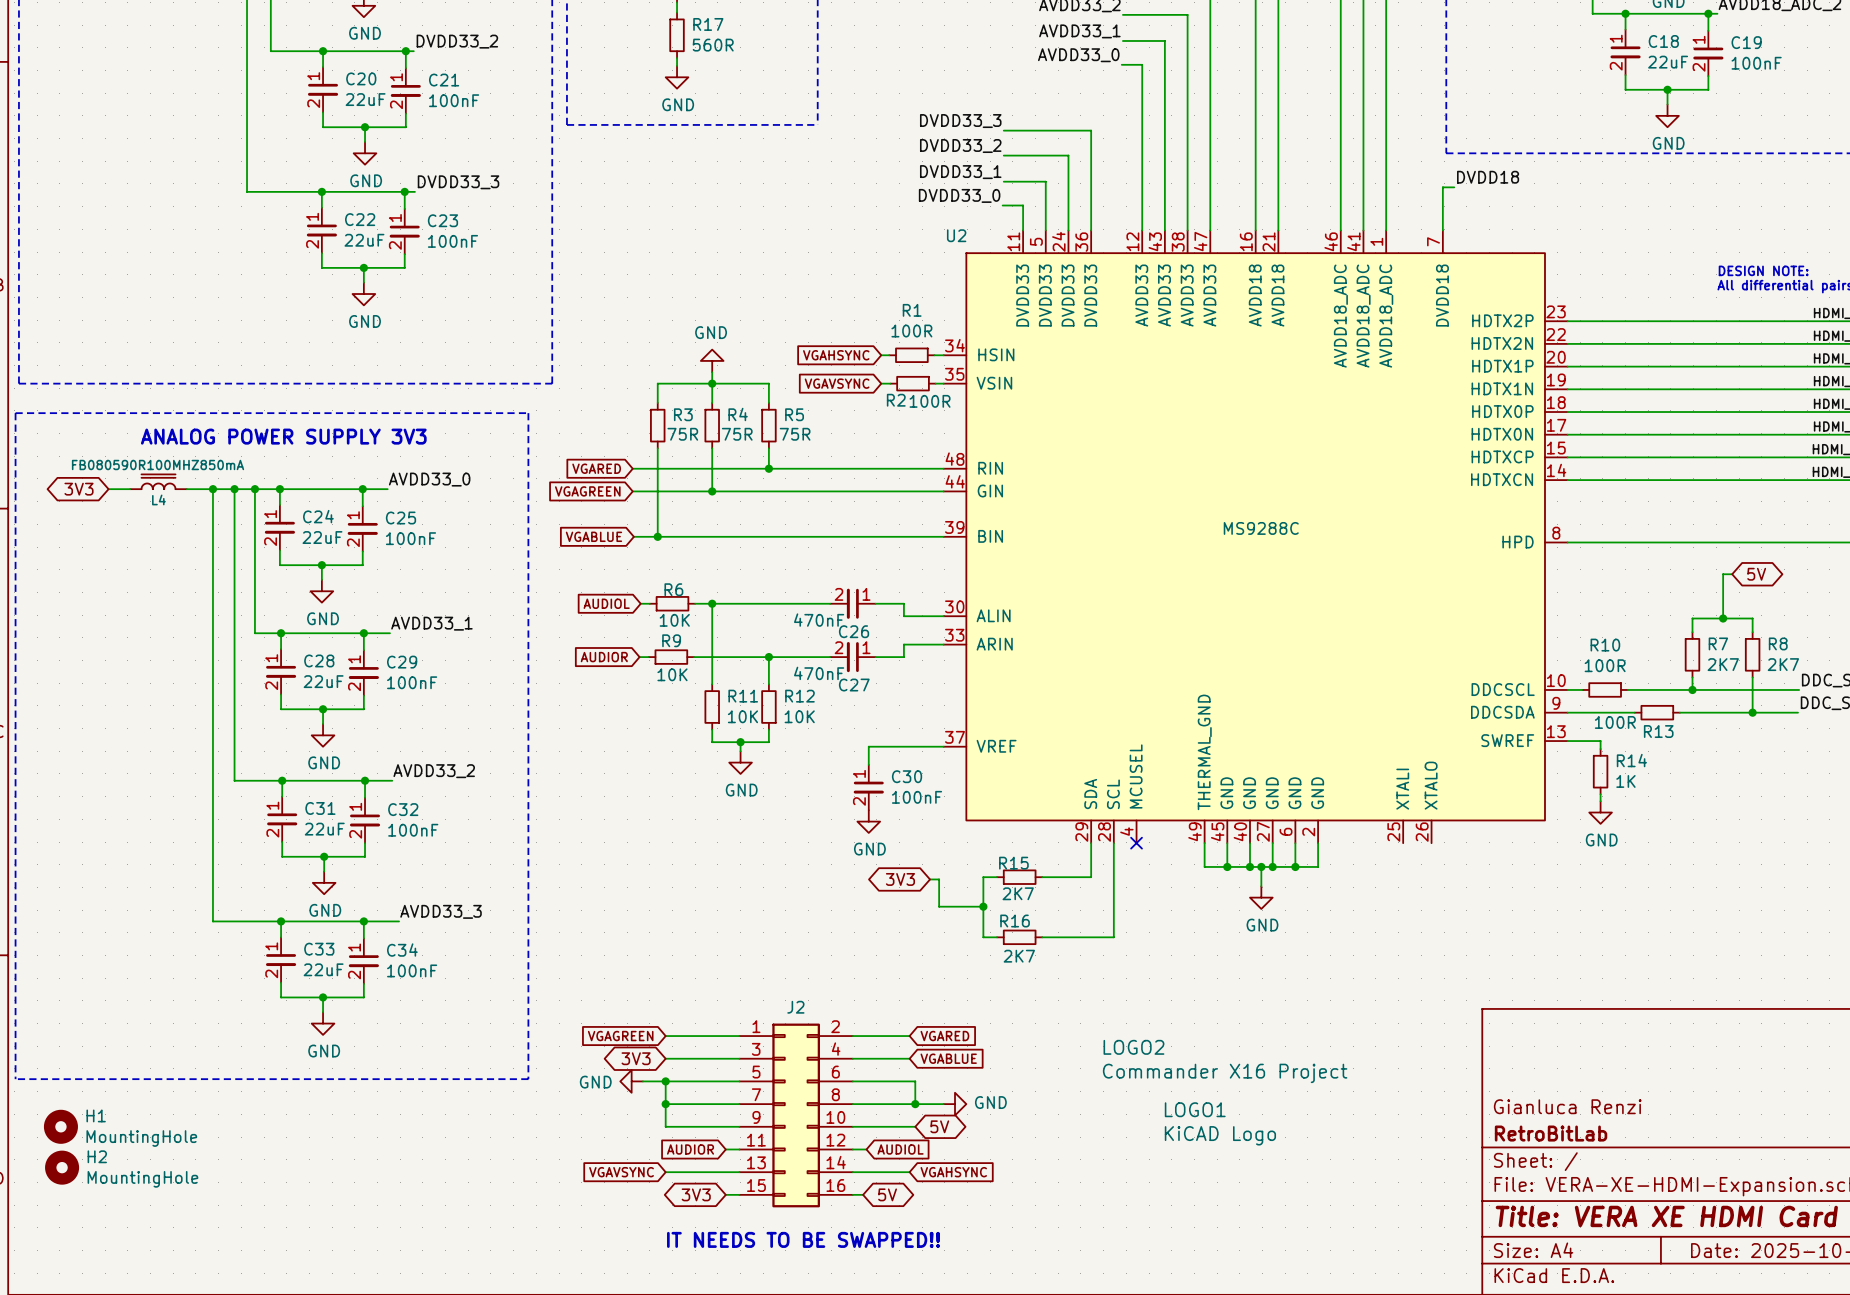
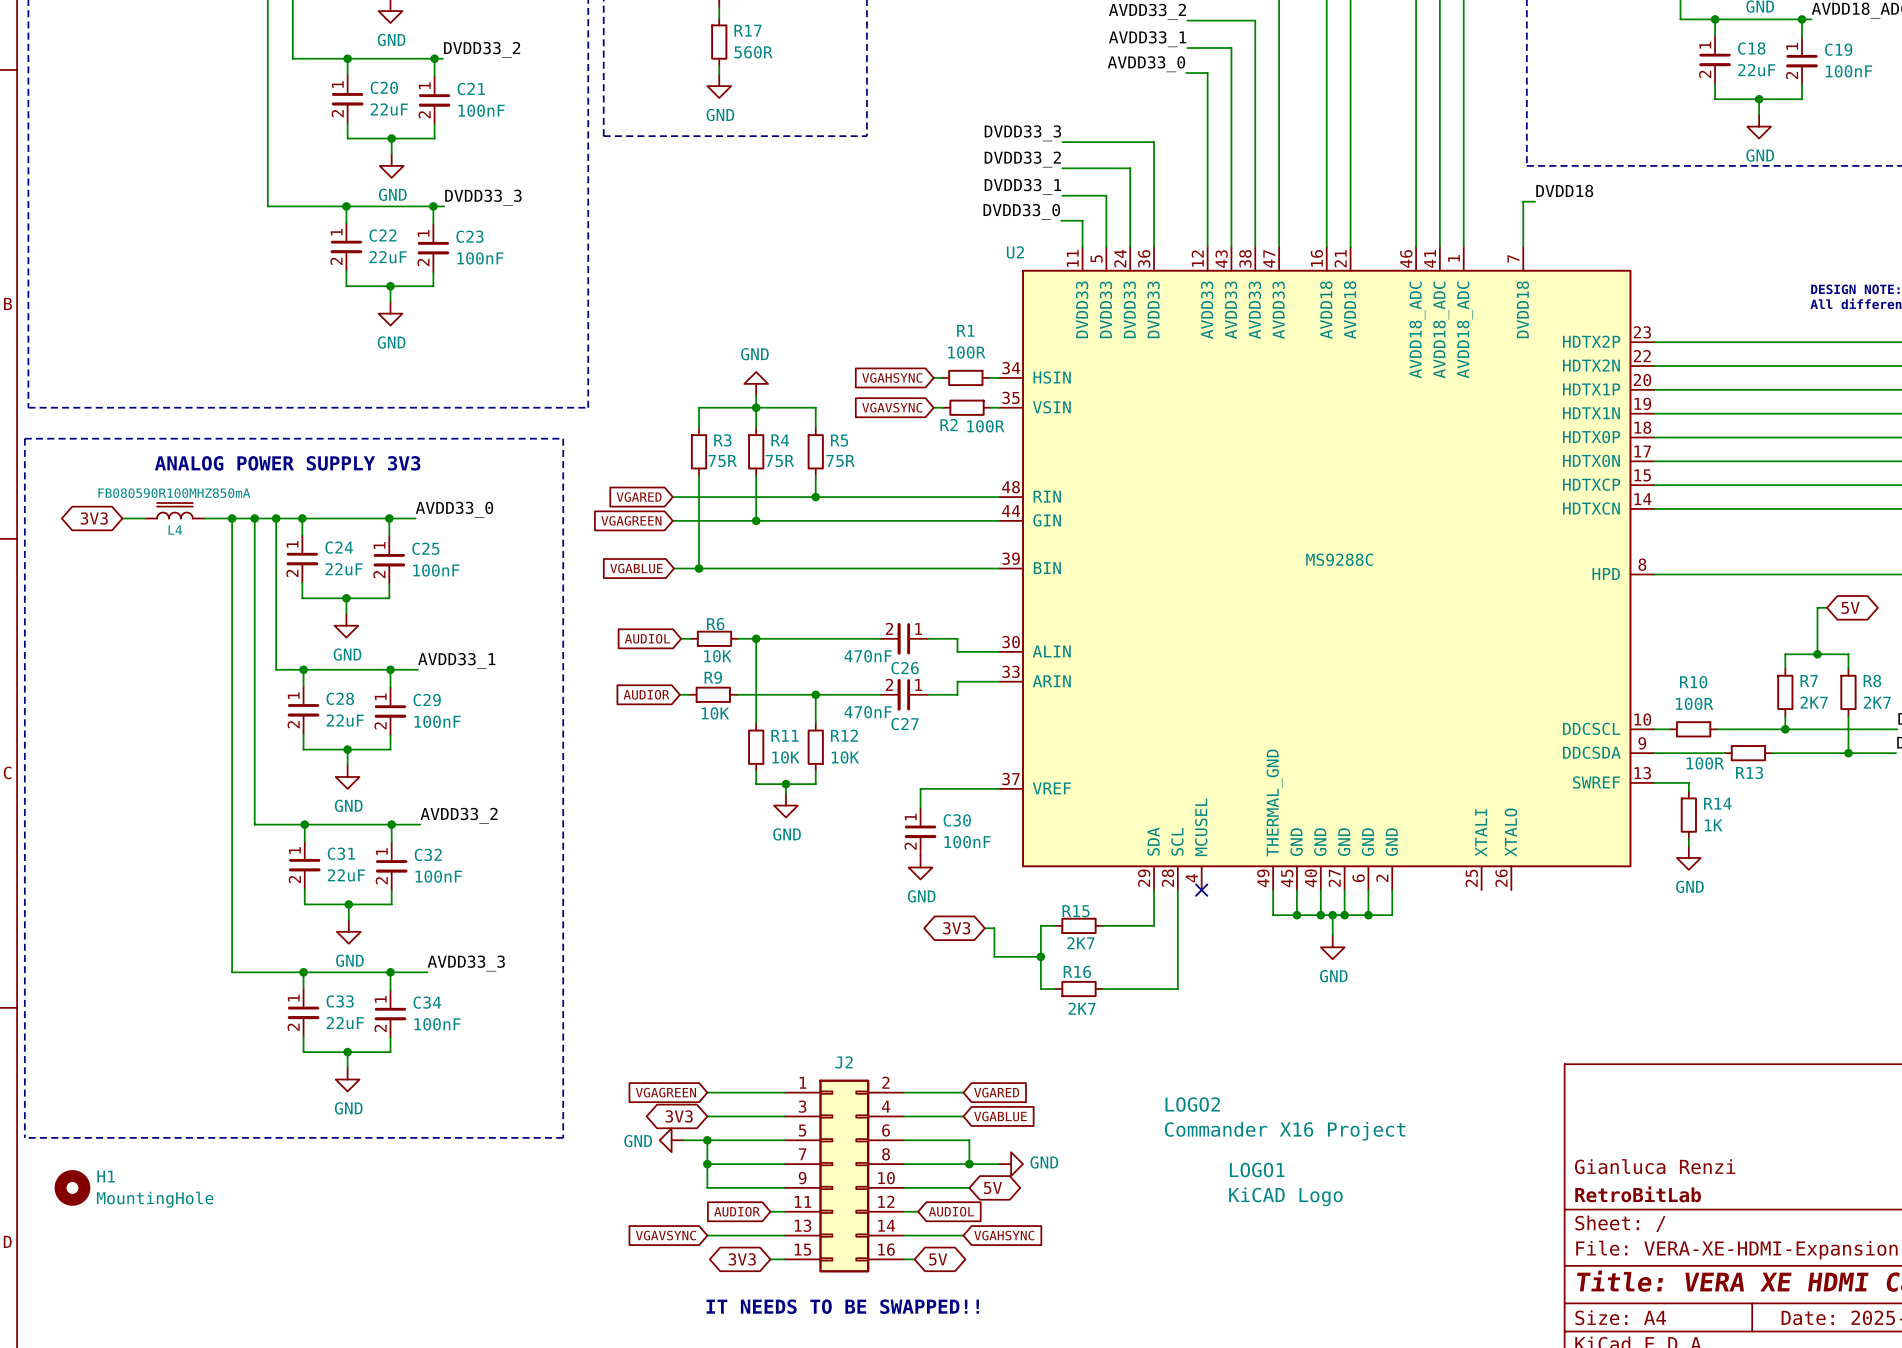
H2: MountingHole (62, 1167) -> none

